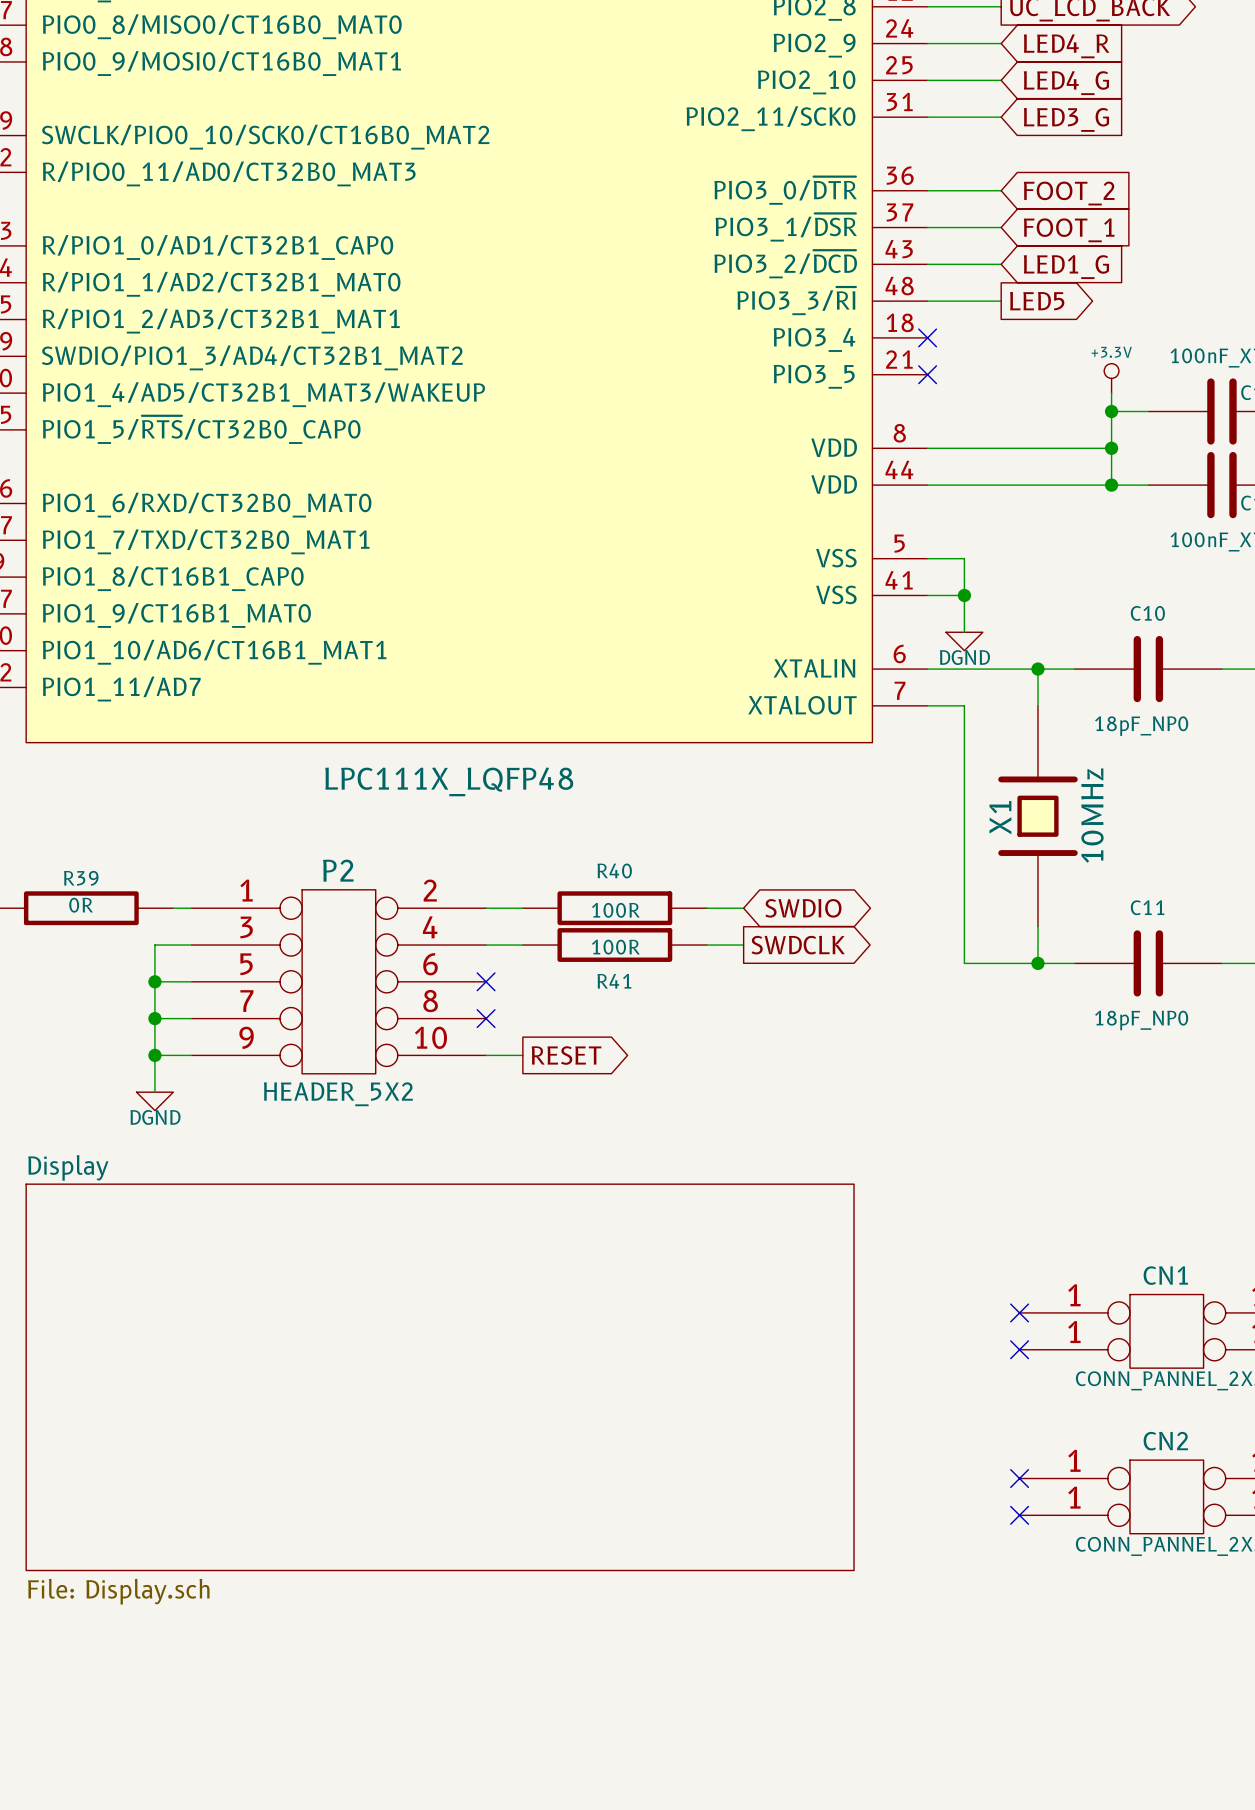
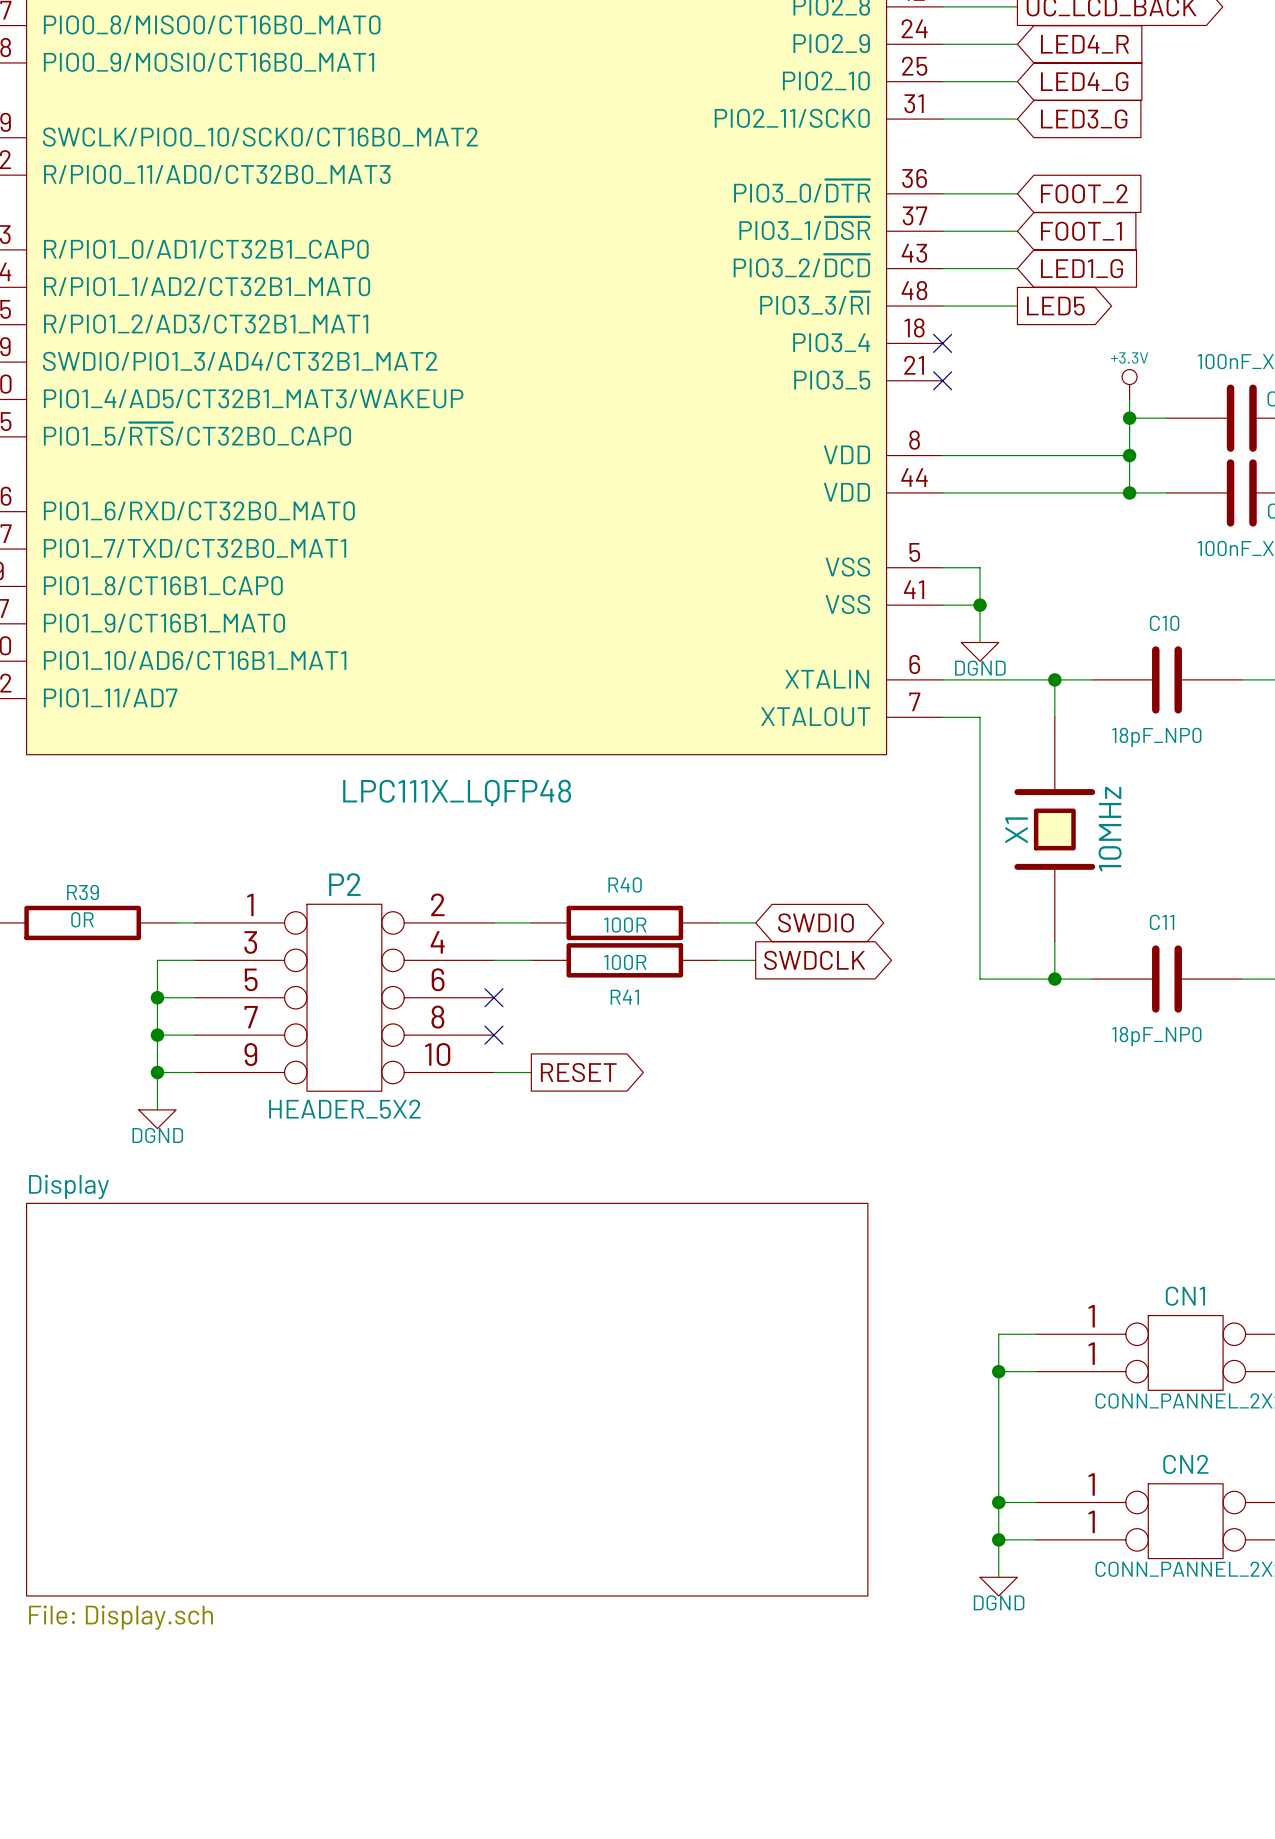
wire: none -> (1036, 1334) (998, 1334) (998, 1577)
no-connect mark: (1019, 1312) -> none
wire: none -> (998, 1371) (1036, 1371)
junction: none -> (998, 1371)
no-connect mark: (1019, 1349) -> none
wire: none -> (998, 1502) (1036, 1502)
junction: none -> (998, 1502)
no-connect mark: (1019, 1478) -> none
wire: none -> (998, 1539) (1036, 1539)
junction: none -> (998, 1539)
no-connect mark: (1019, 1515) -> none
power symbol: none -> DGND (998, 1586)

